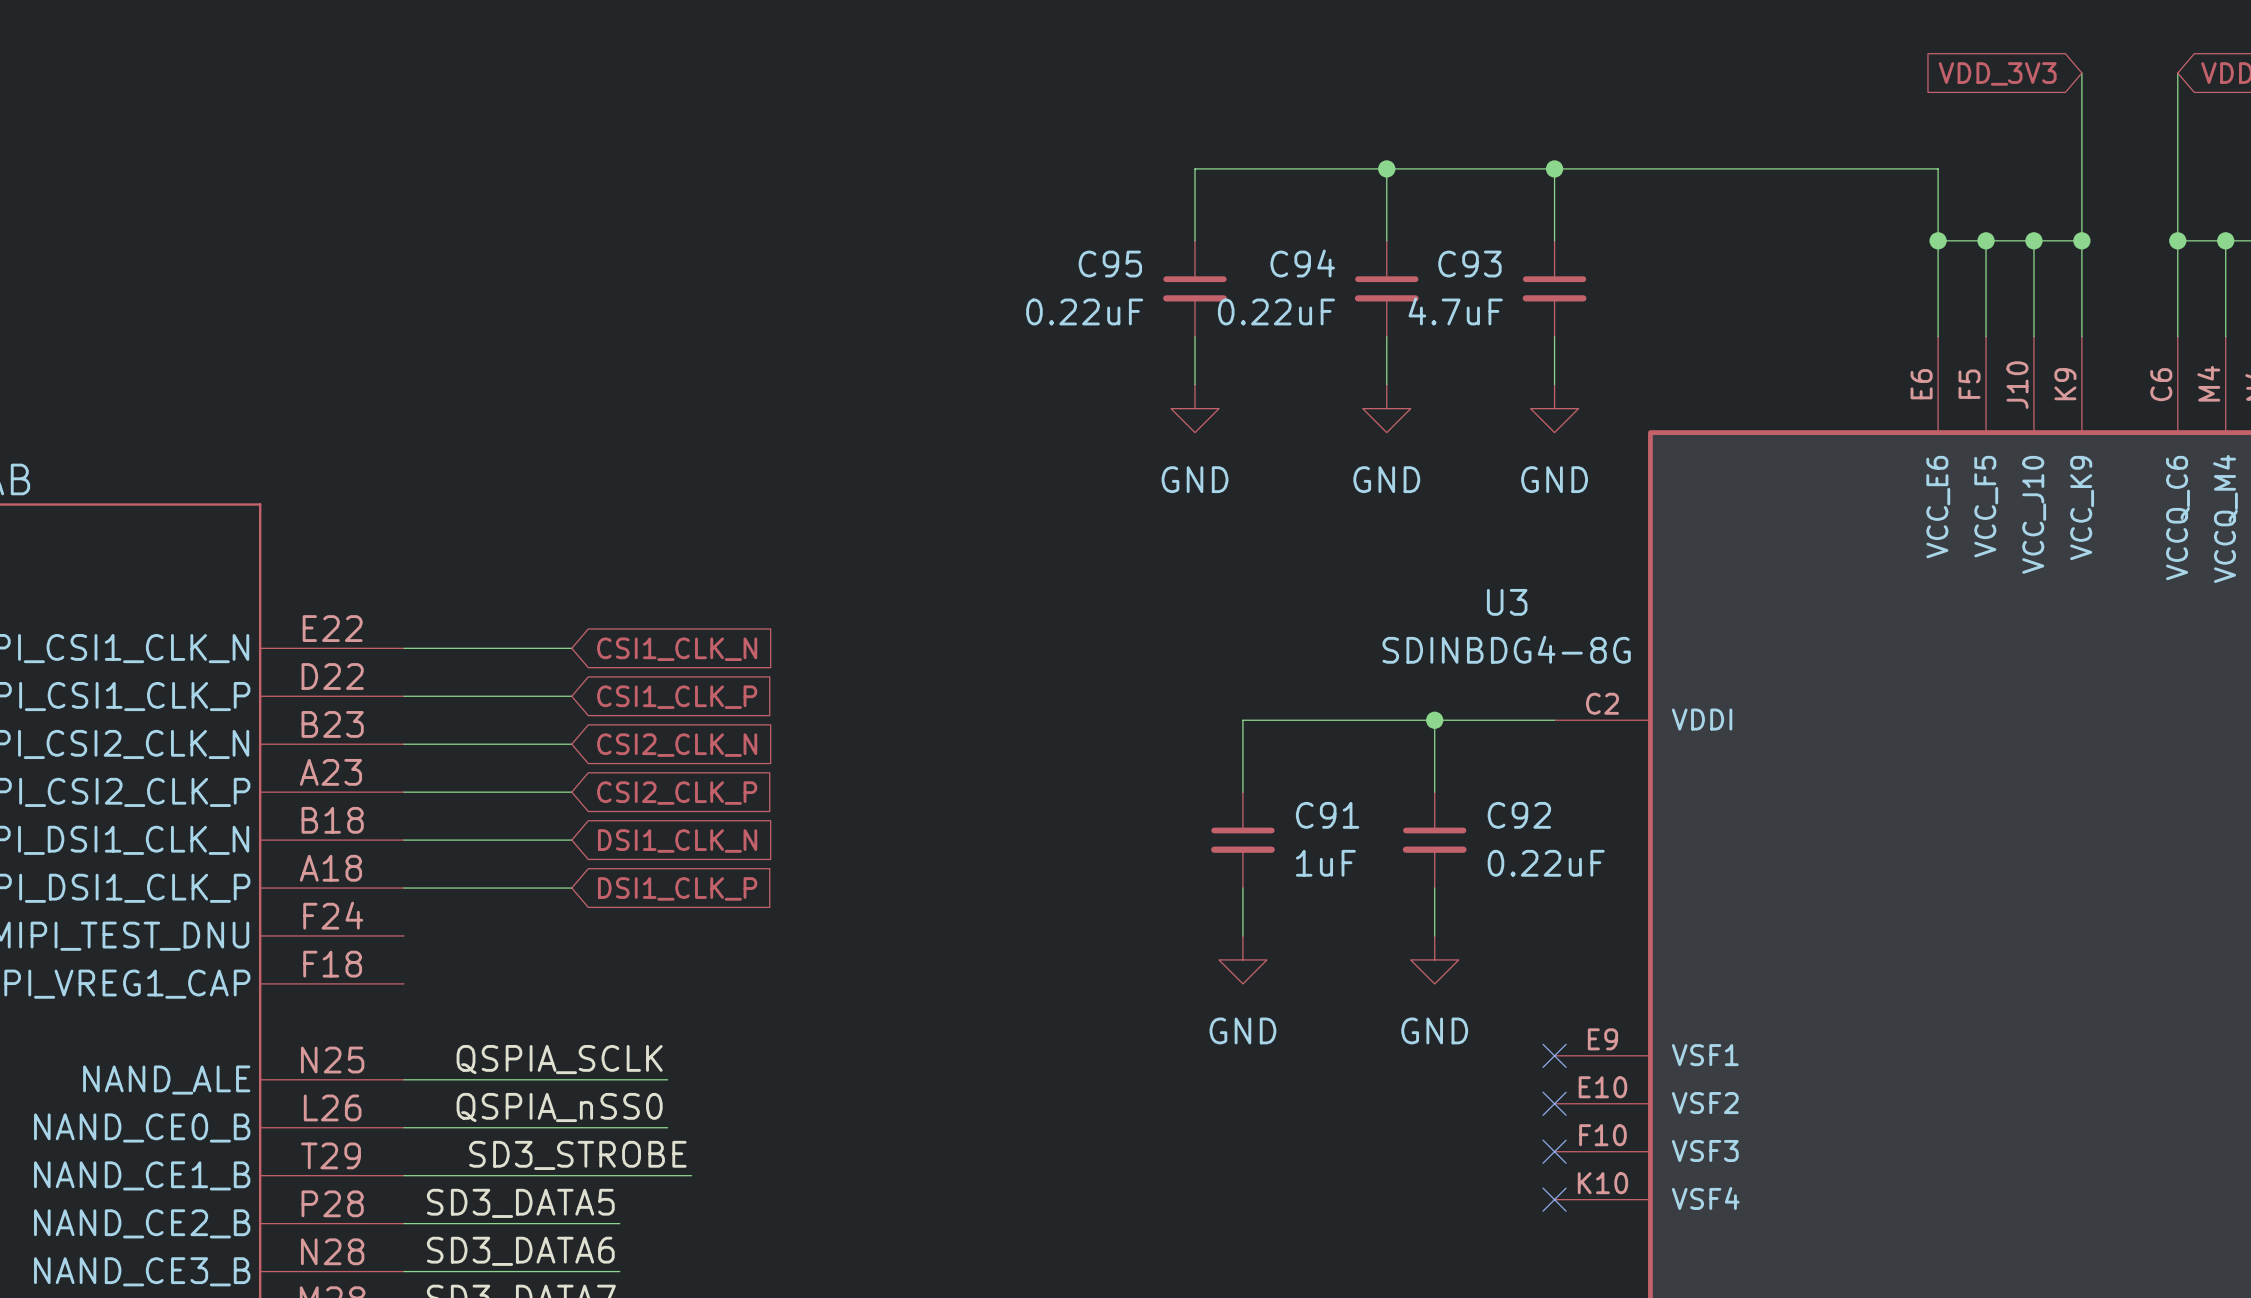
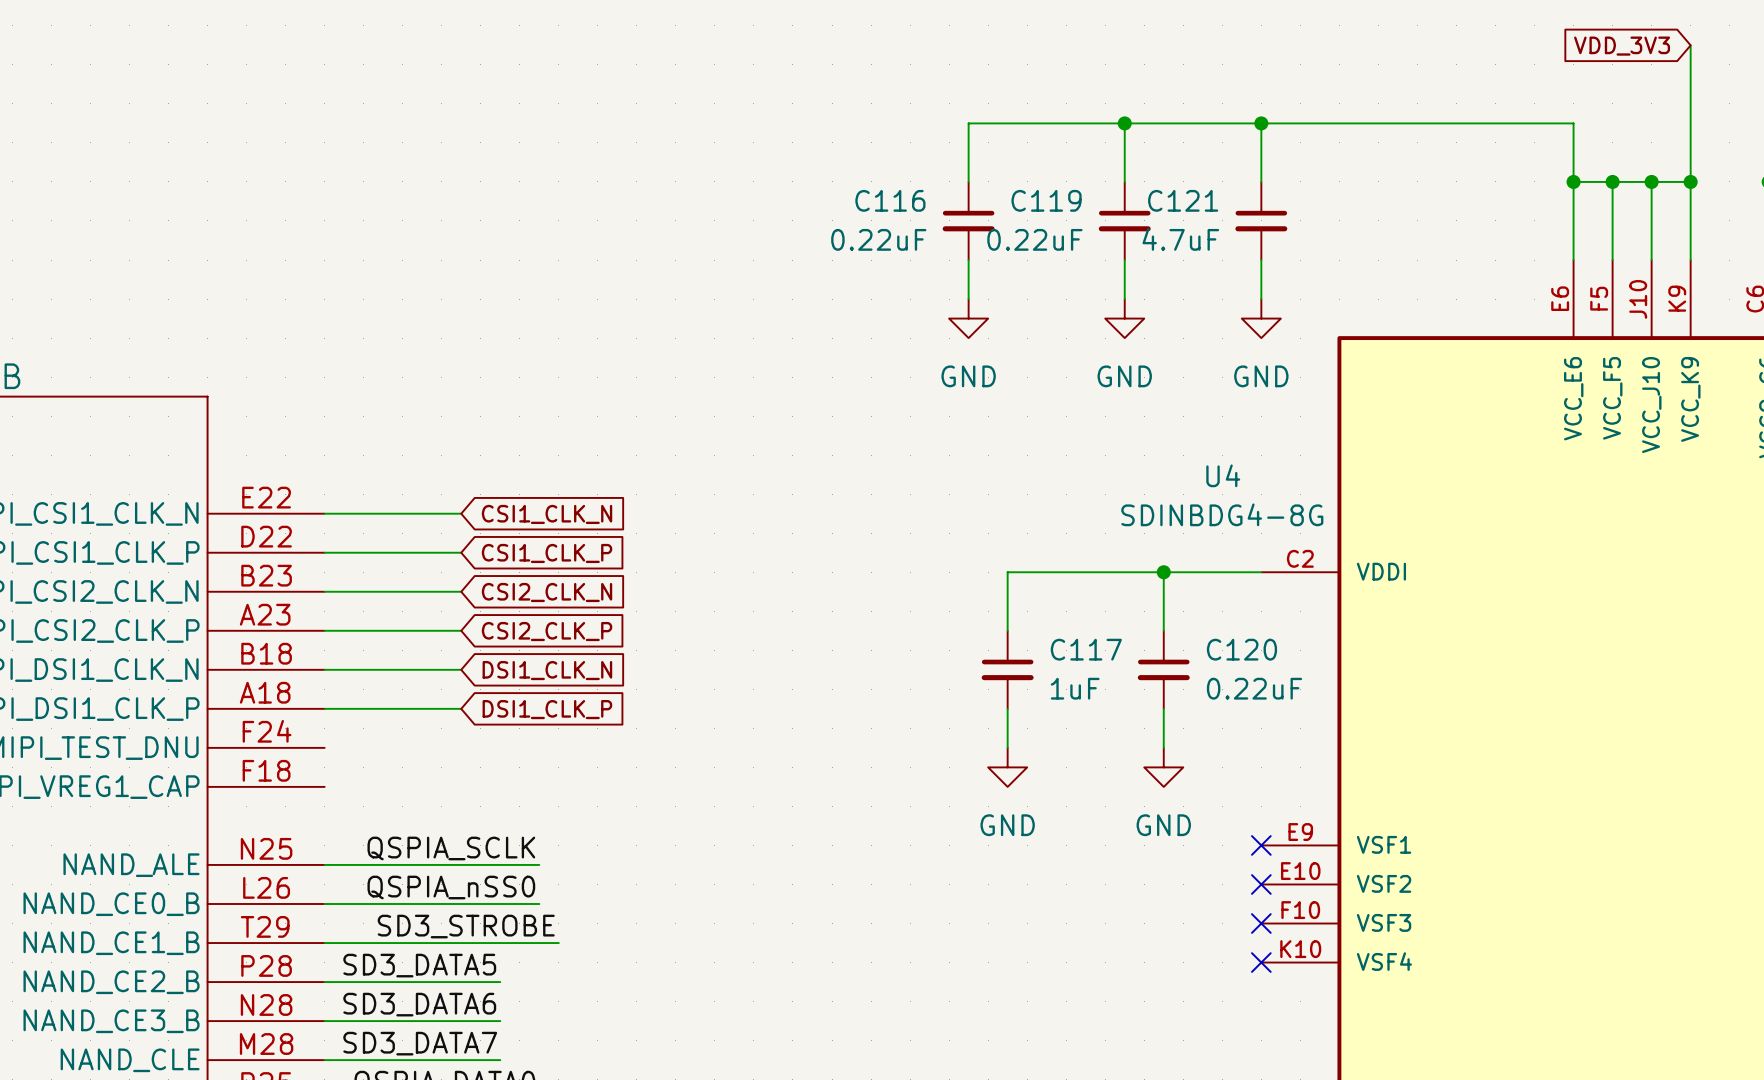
C94 name: C94 (1302, 263) -> C119 (1046, 200)
C95 name: C95 (1110, 264) -> C116 (890, 200)
C93 name: C93 (1469, 264) -> C121 (1183, 200)
U3 name: U3 (1507, 602) -> U4 (1223, 475)
C91 name: C91 (1327, 815) -> C117 (1086, 649)
C92 name: C92 (1519, 815) -> C120 (1241, 649)

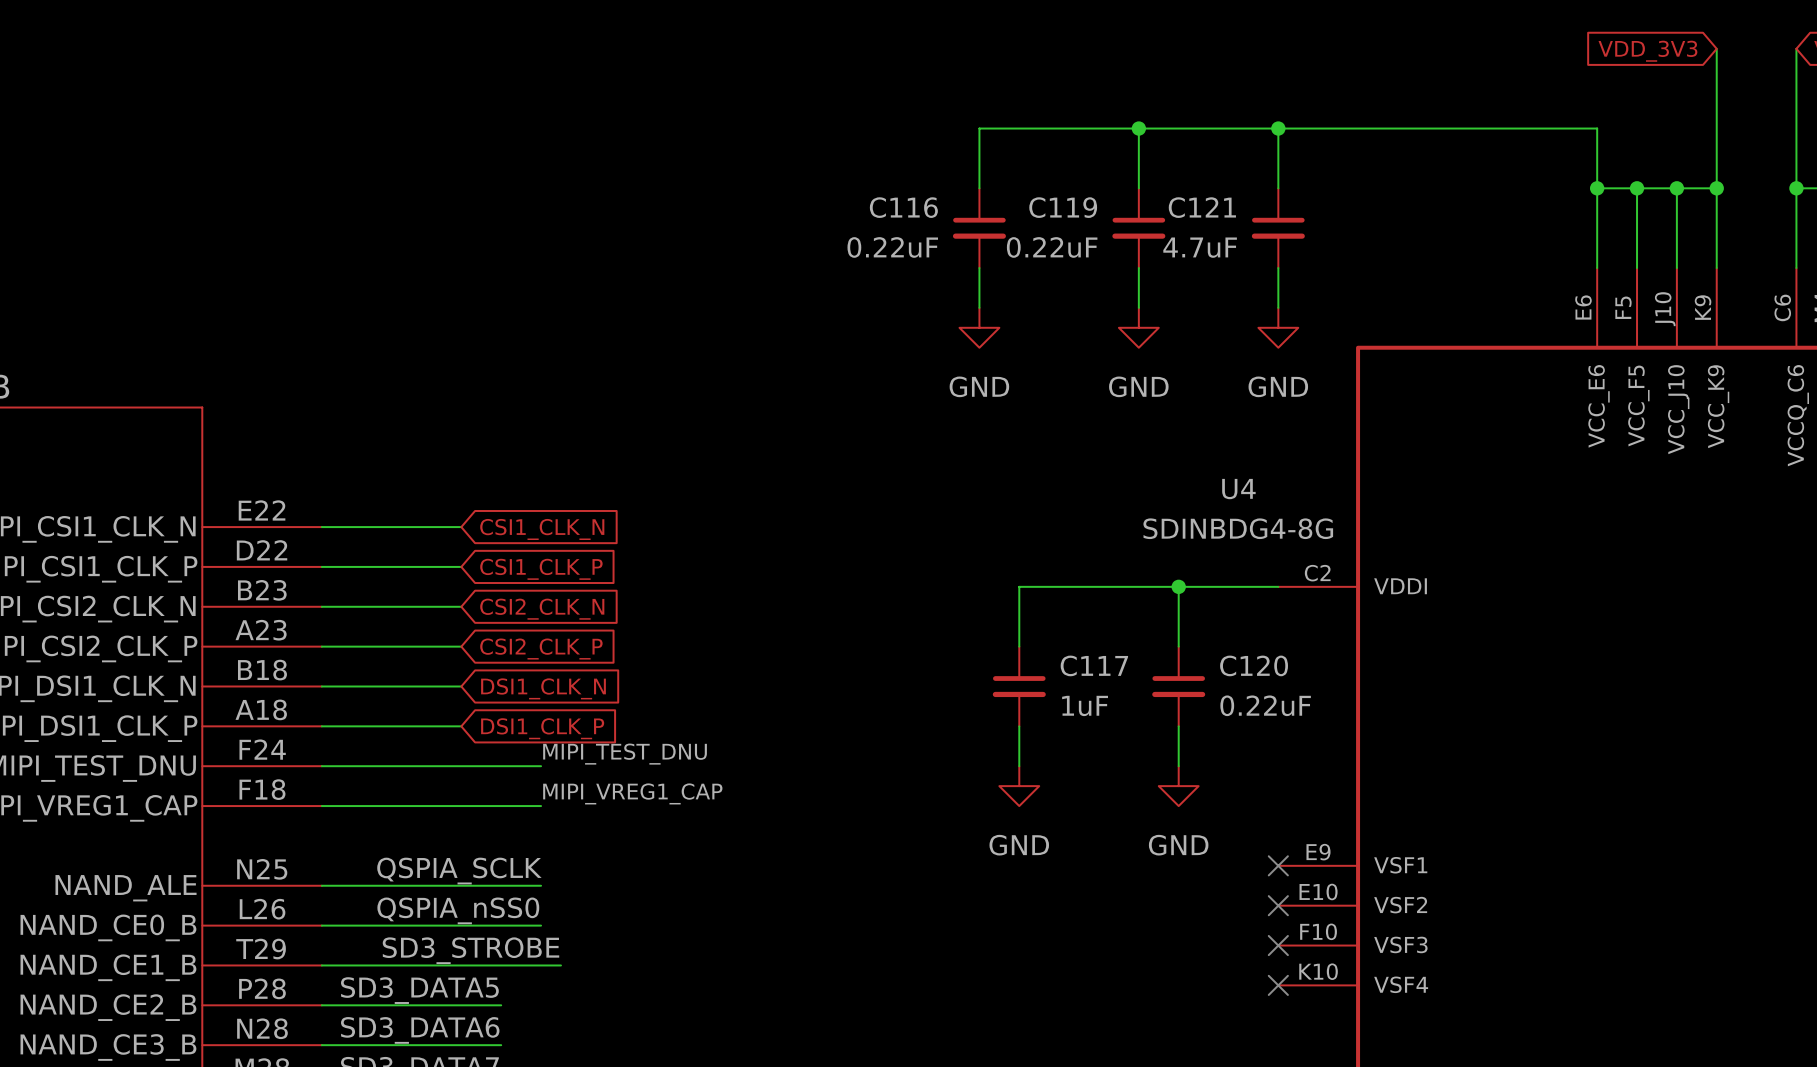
label: none -> MIPI_TEST_DNU (625, 754)
wire: none -> (321, 766) (541, 766)
label: none -> MIPI_VREG1_CAP (632, 793)
wire: none -> (321, 806) (541, 806)

